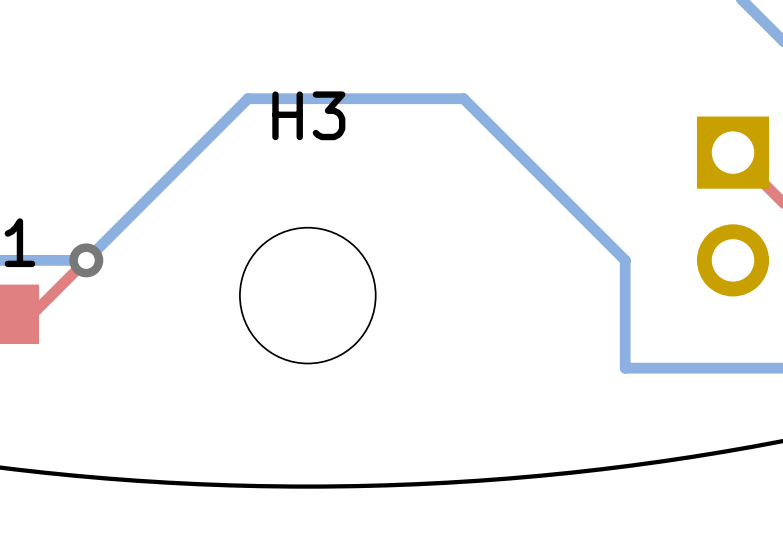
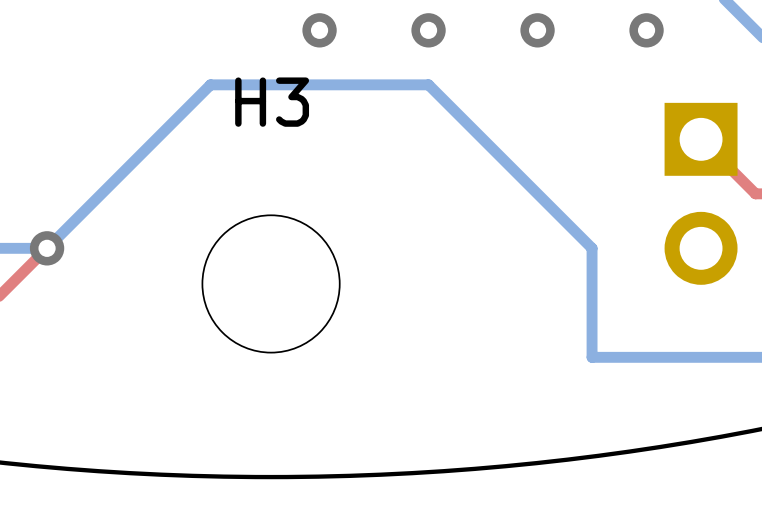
via: none -> (319, 30)
via: none -> (428, 30)
via: none -> (537, 30)
via: none -> (646, 30)

